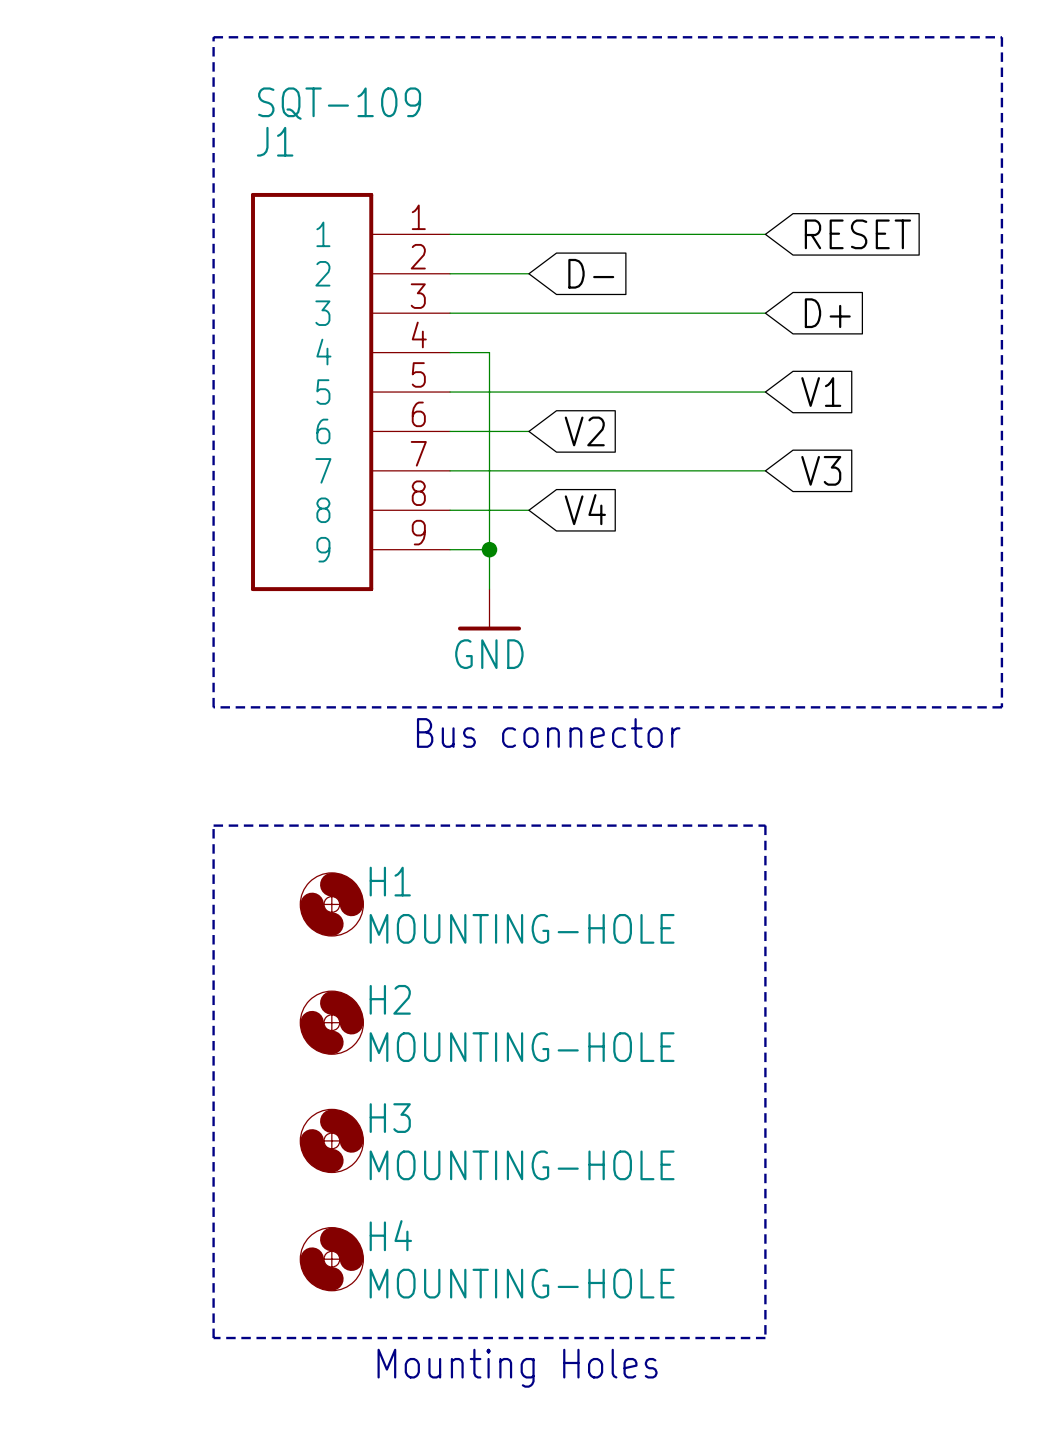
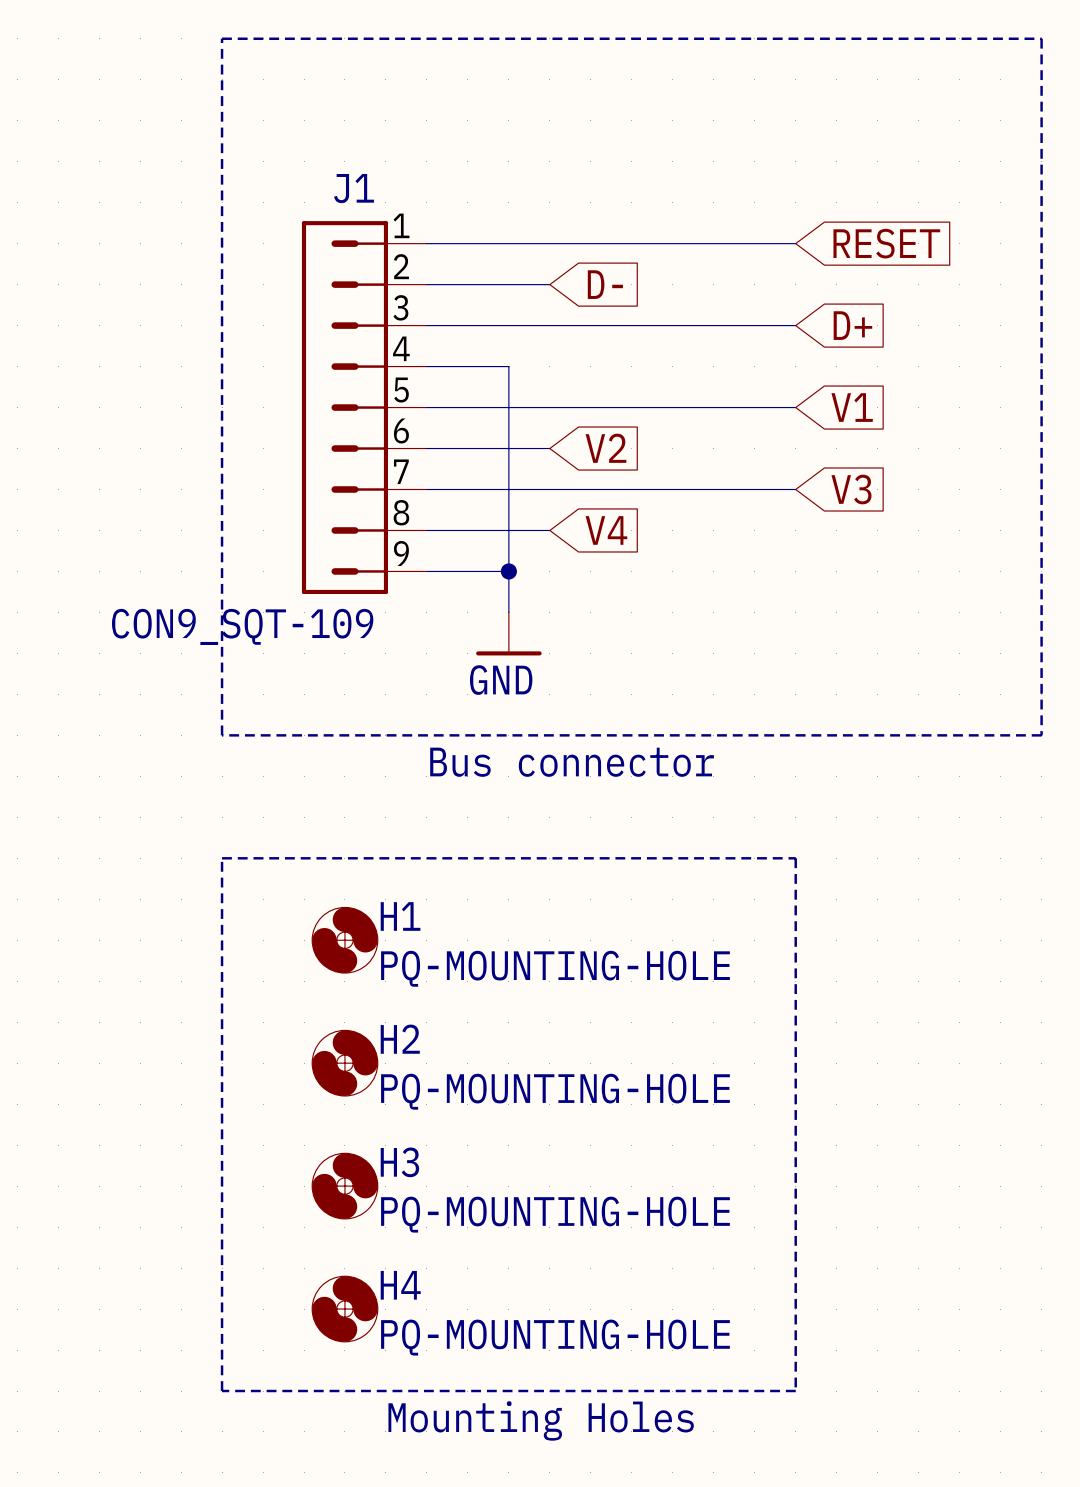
J1 value: SQT-109 (339, 103) -> CON9_SQT-109 (242, 626)
J1 name position: J1 (275, 141) -> J1 (354, 188)
J1 symbol: [251, 192, 451, 592] -> [301, 221, 427, 594]
H1 value: MOUNTING-HOLE (522, 928) -> PQ-MOUNTING-HOLE (555, 968)
H2 value: MOUNTING-HOLE (522, 1047) -> PQ-MOUNTING-HOLE (555, 1091)
H3 value: MOUNTING-HOLE (522, 1165) -> PQ-MOUNTING-HOLE (555, 1214)
H4 value: MOUNTING-HOLE (522, 1283) -> PQ-MOUNTING-HOLE (555, 1337)

